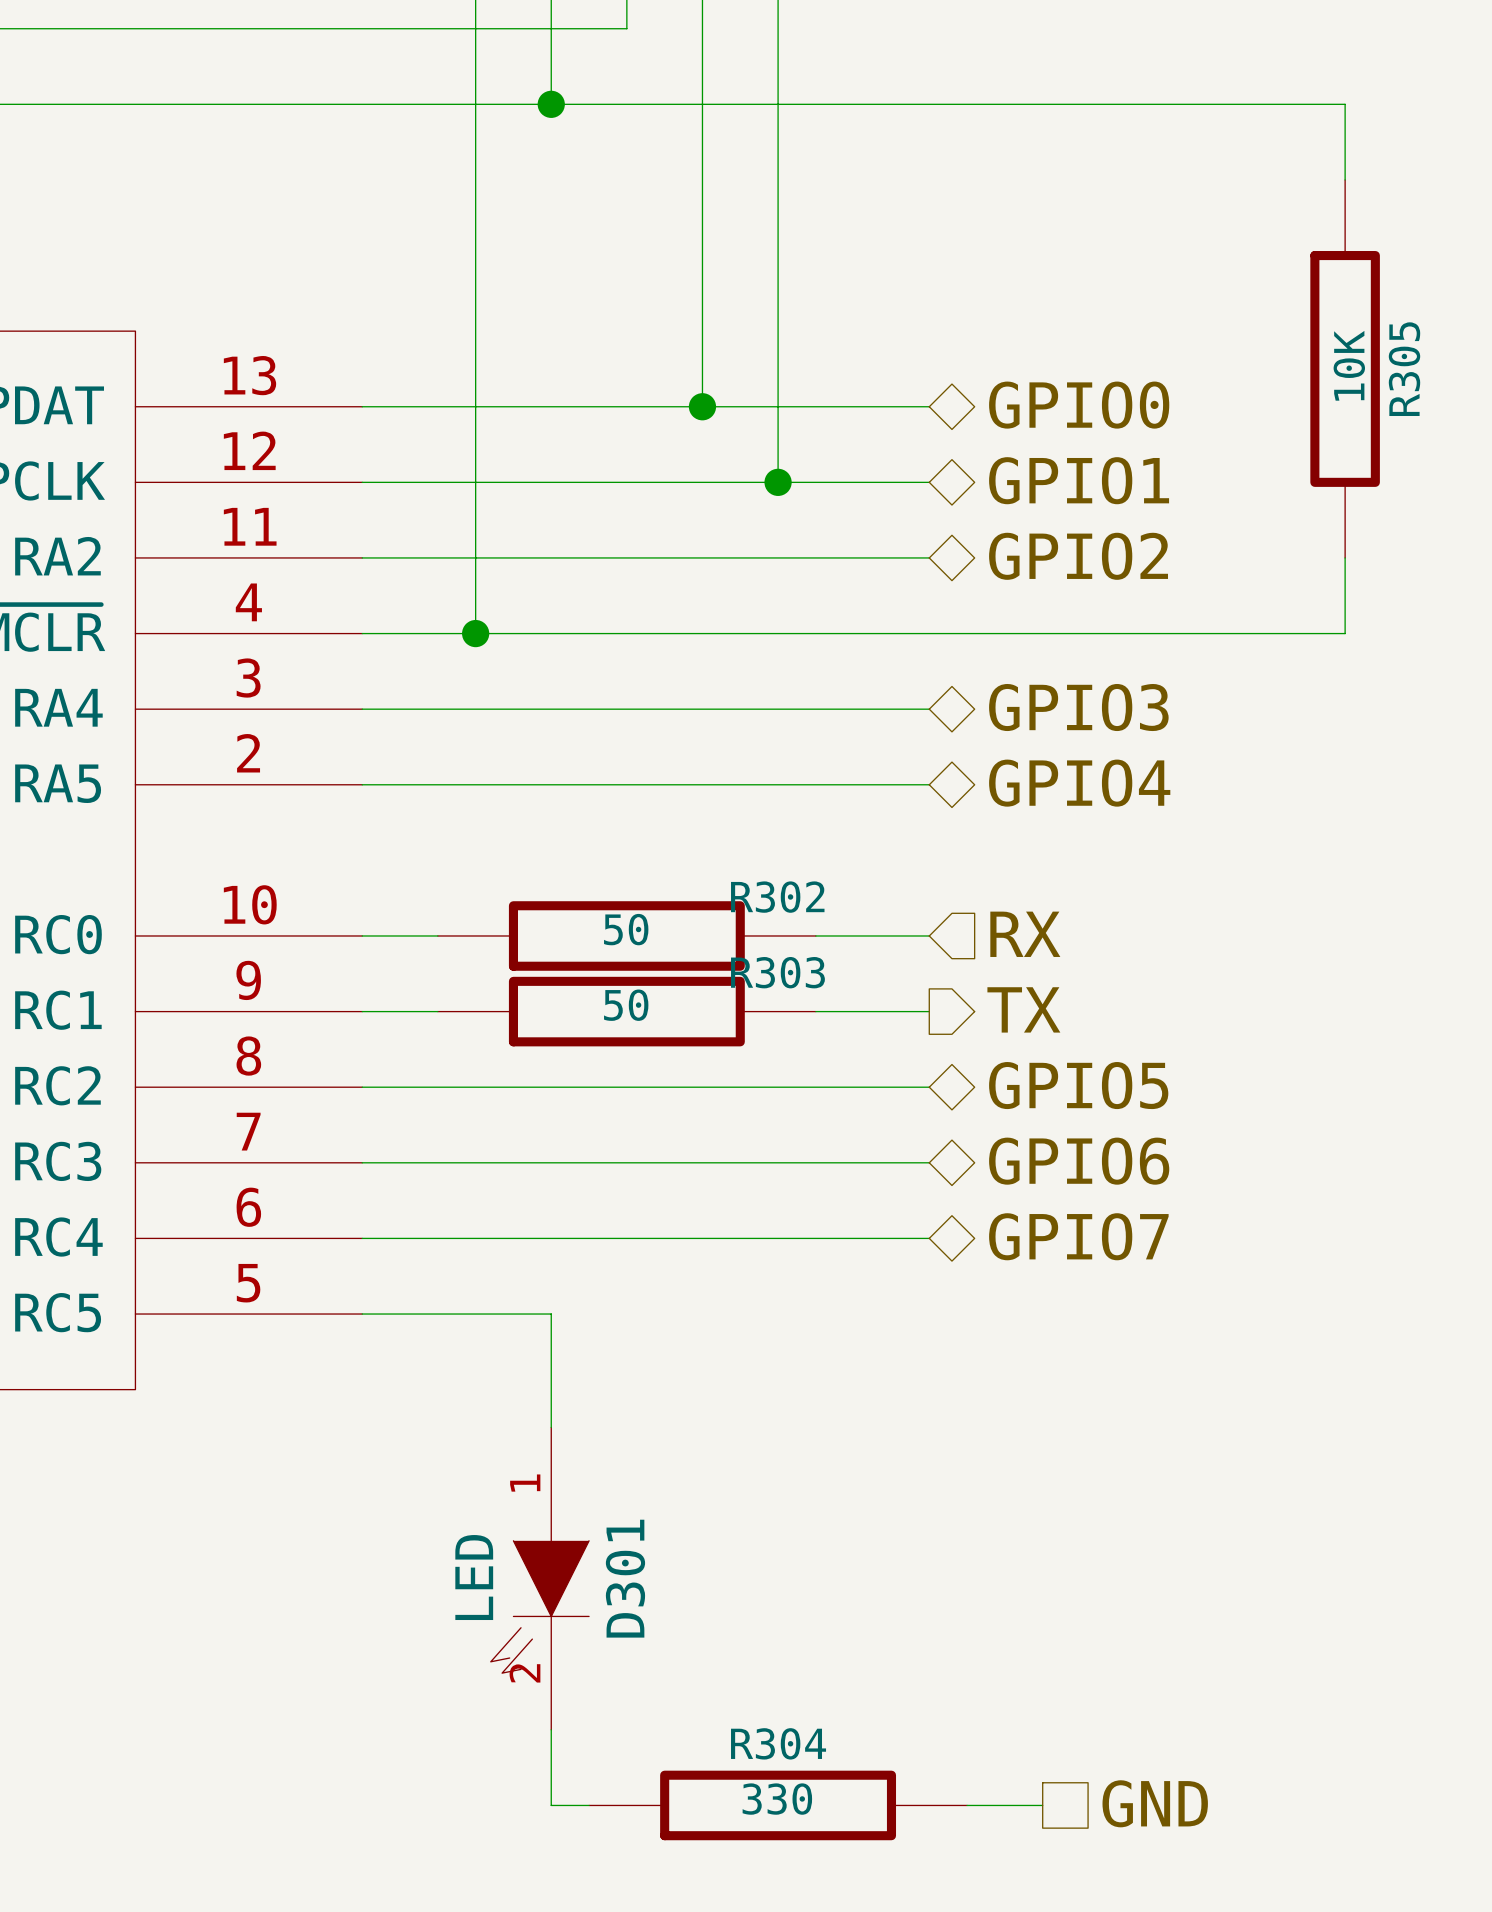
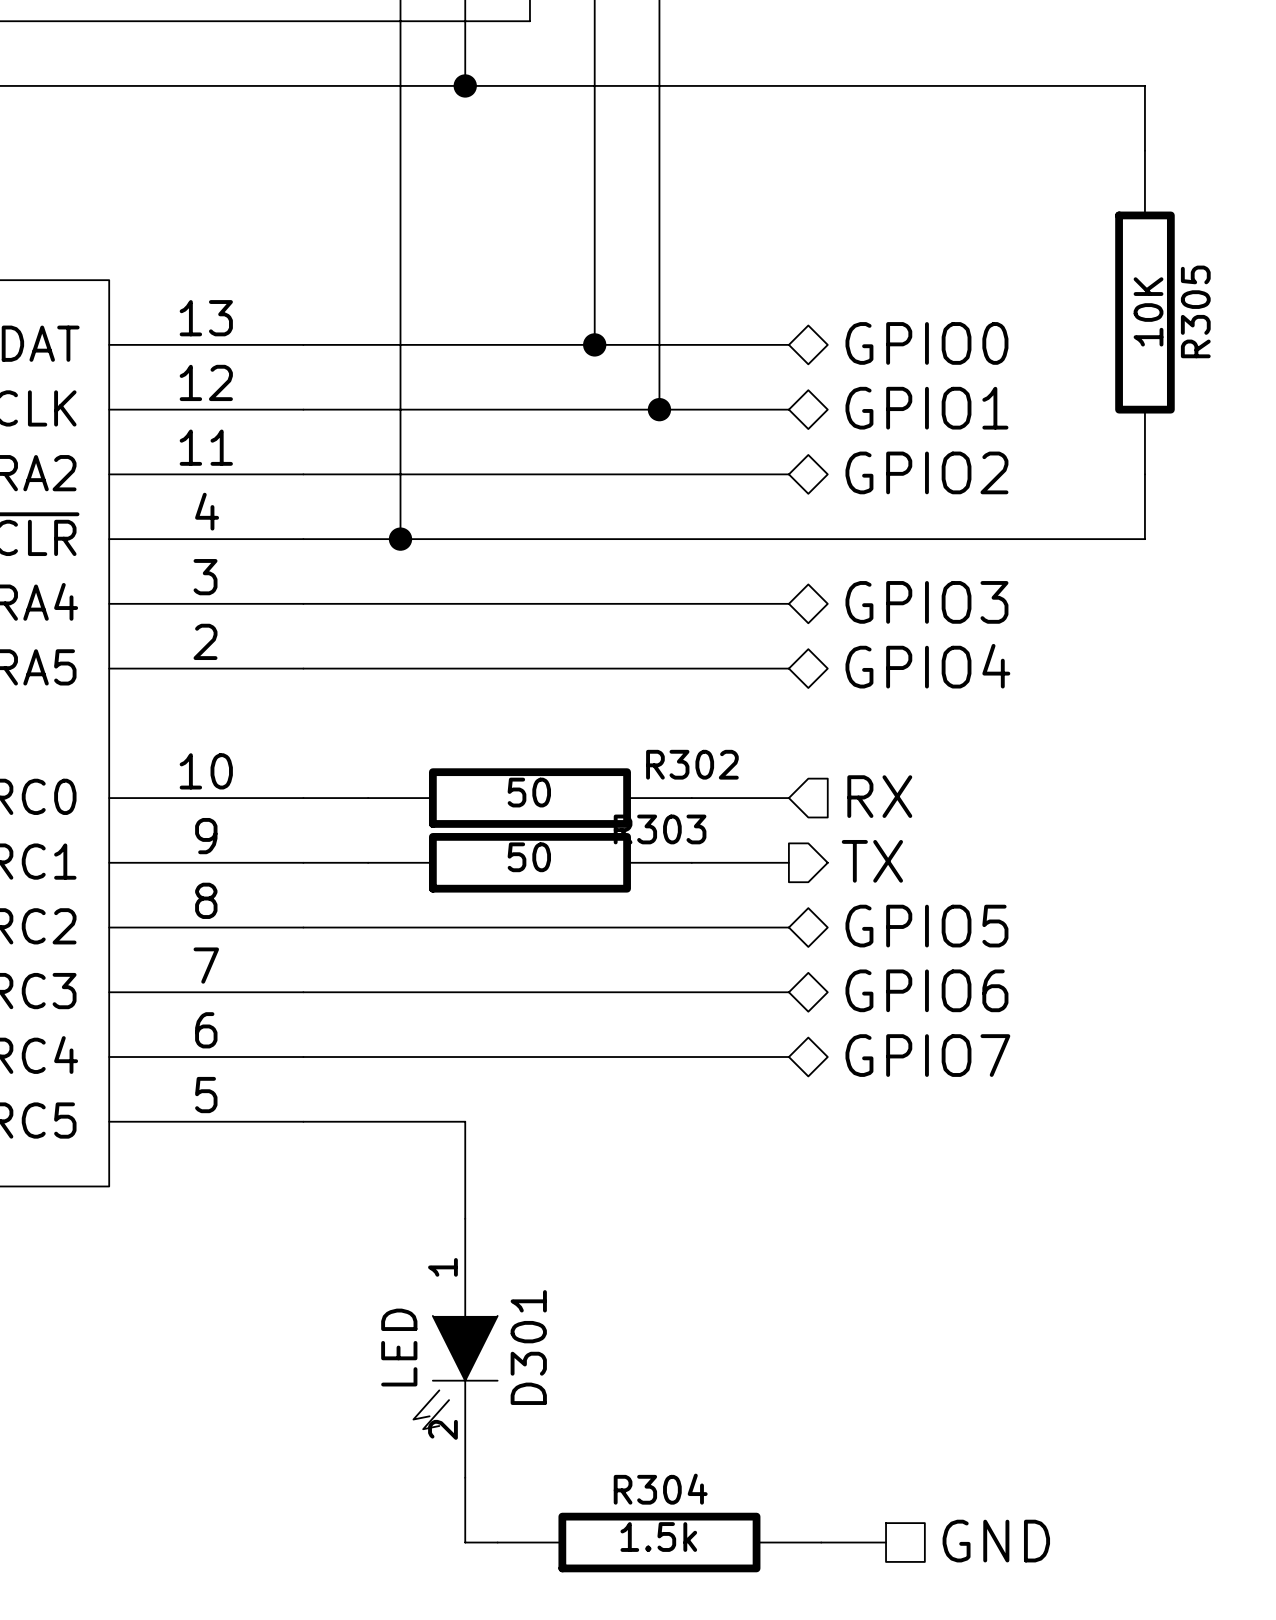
R302 name position: R302 (777, 897) -> R302 (692, 764)
R304 value: 330 (777, 1799) -> 1.5k (658, 1537)

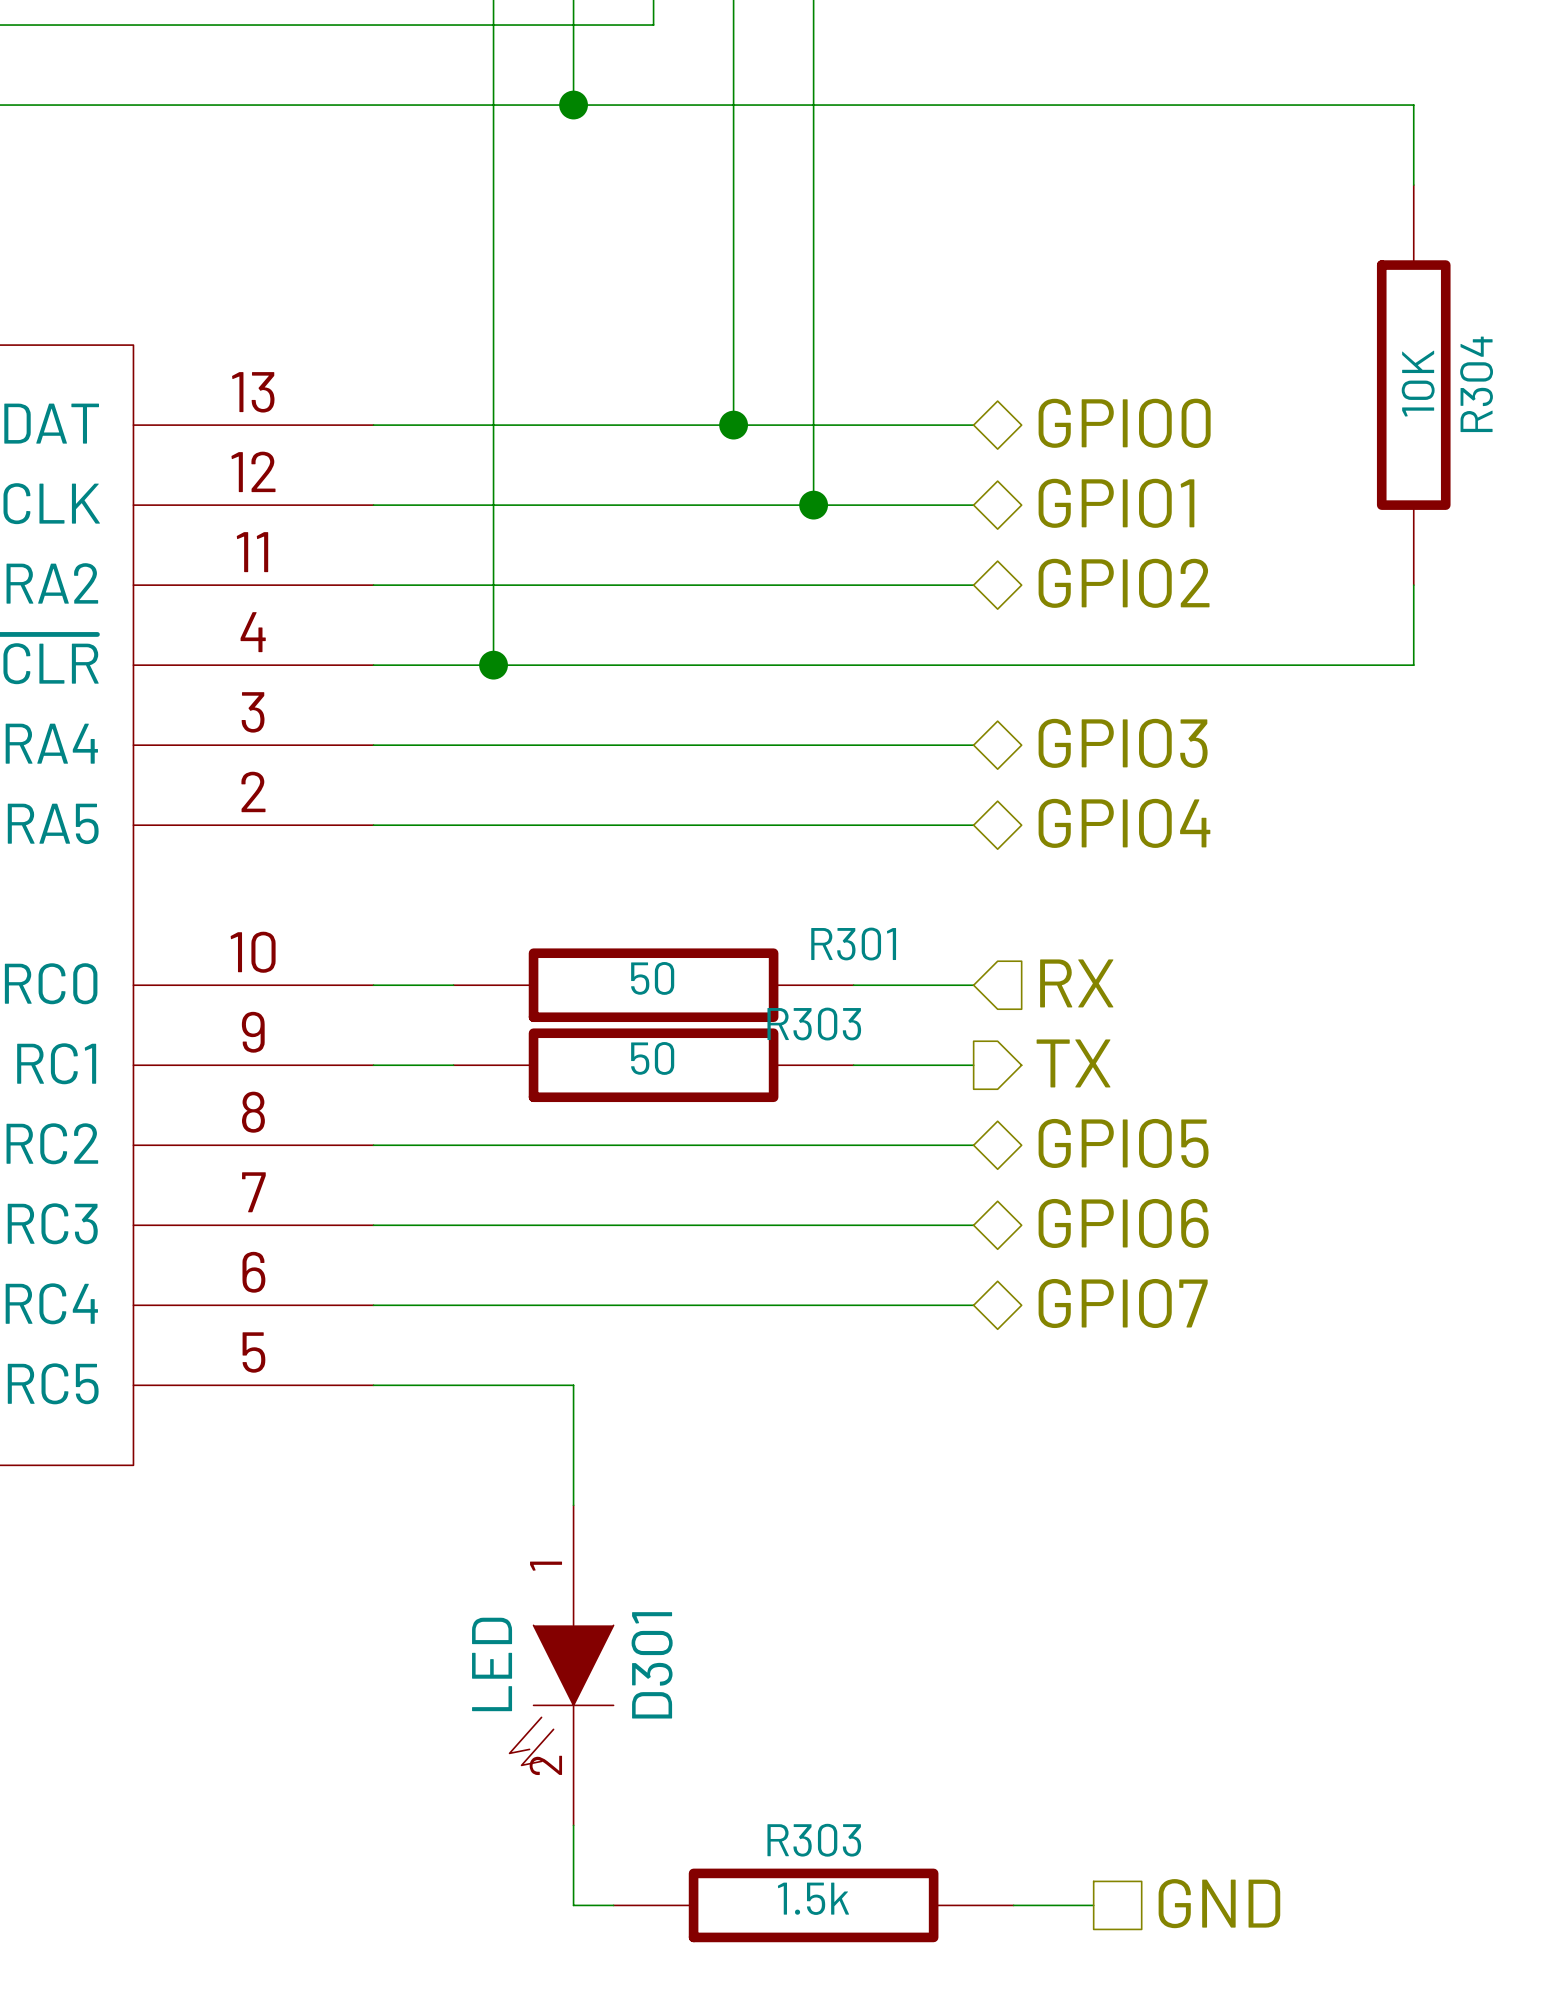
R305 name: R305 (1195, 311) -> R304 (1476, 384)
R302 name: R302 (692, 764) -> R301 (853, 944)
R304 name: R304 (660, 1489) -> R303 (814, 1840)

